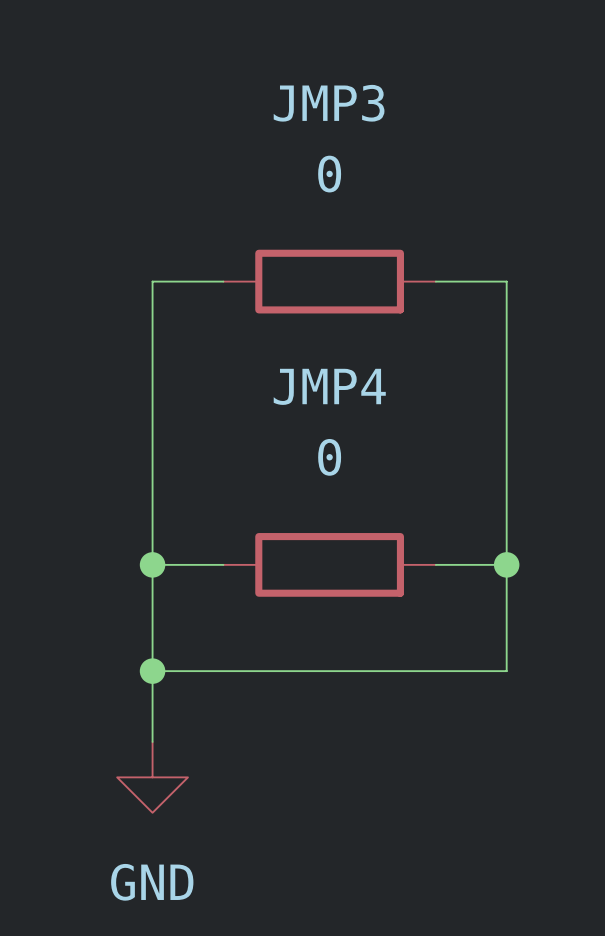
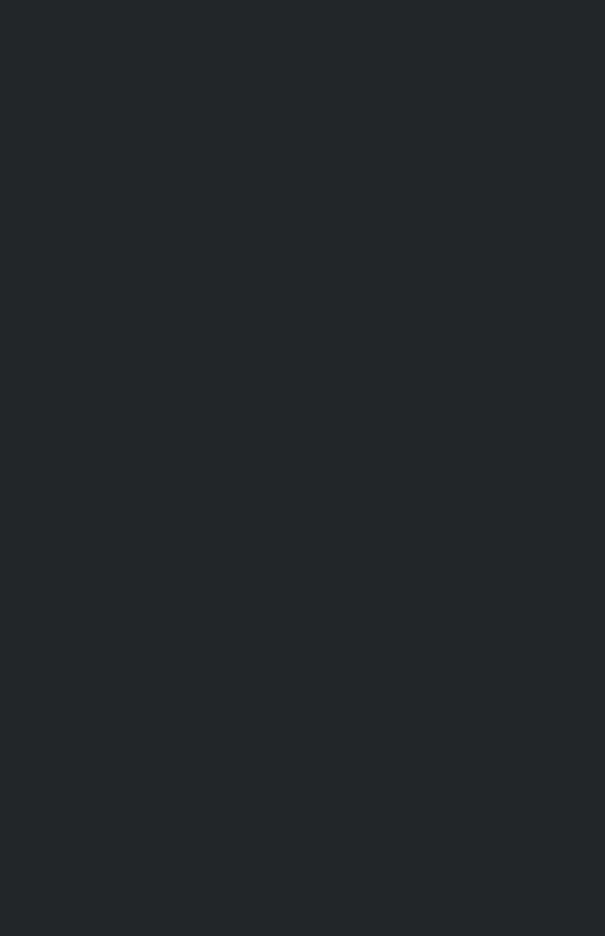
wire: (223, 281) (152, 281) (152, 741) -> none
JMP3: 0 (329, 281) -> none
wire: (435, 281) (506, 281) (506, 671) (152, 671) -> none
wire: (152, 564) (223, 564) -> none
junction: (152, 564) -> none
JMP4: 0 (329, 564) -> none
wire: (435, 564) (506, 564) -> none
junction: (506, 564) -> none
junction: (152, 671) -> none
power symbol: GND (152, 777) -> none

